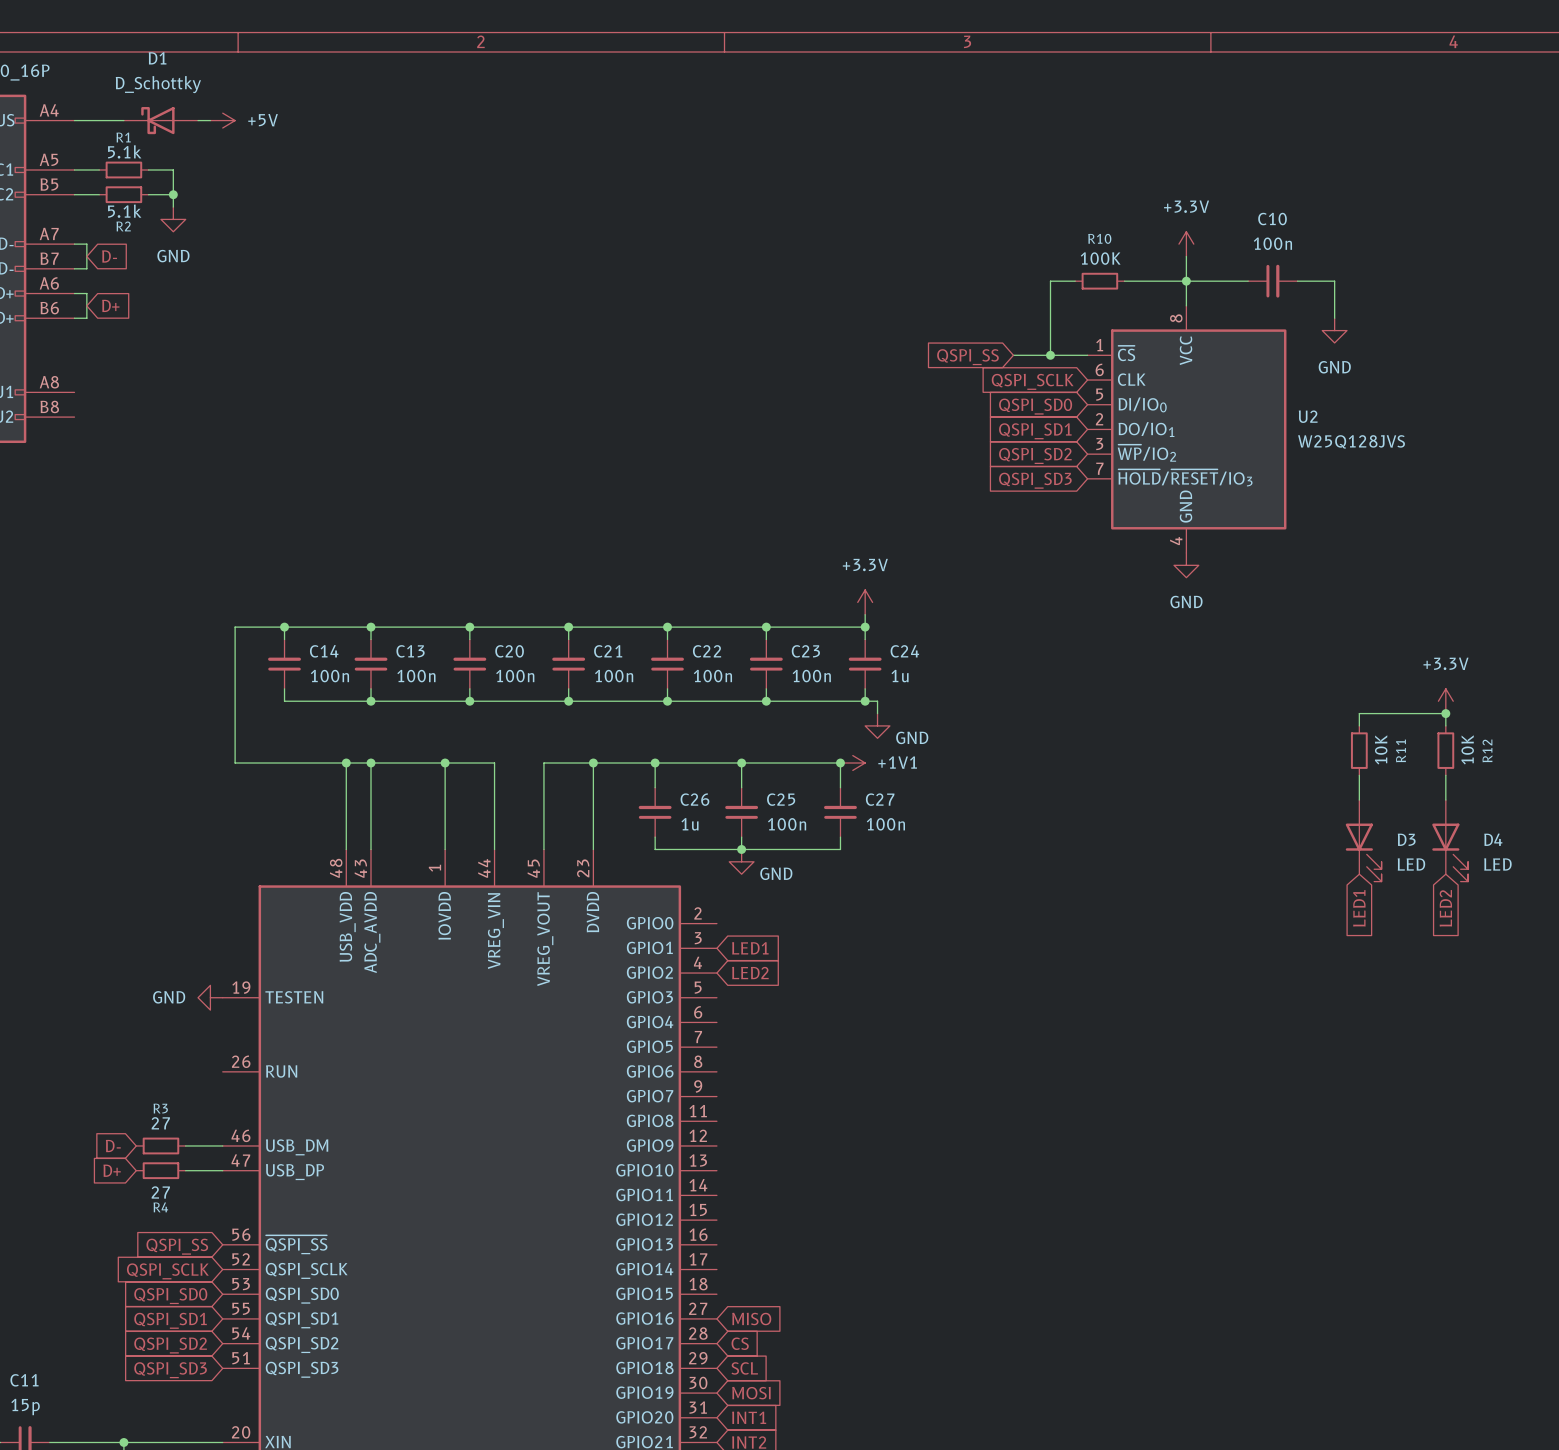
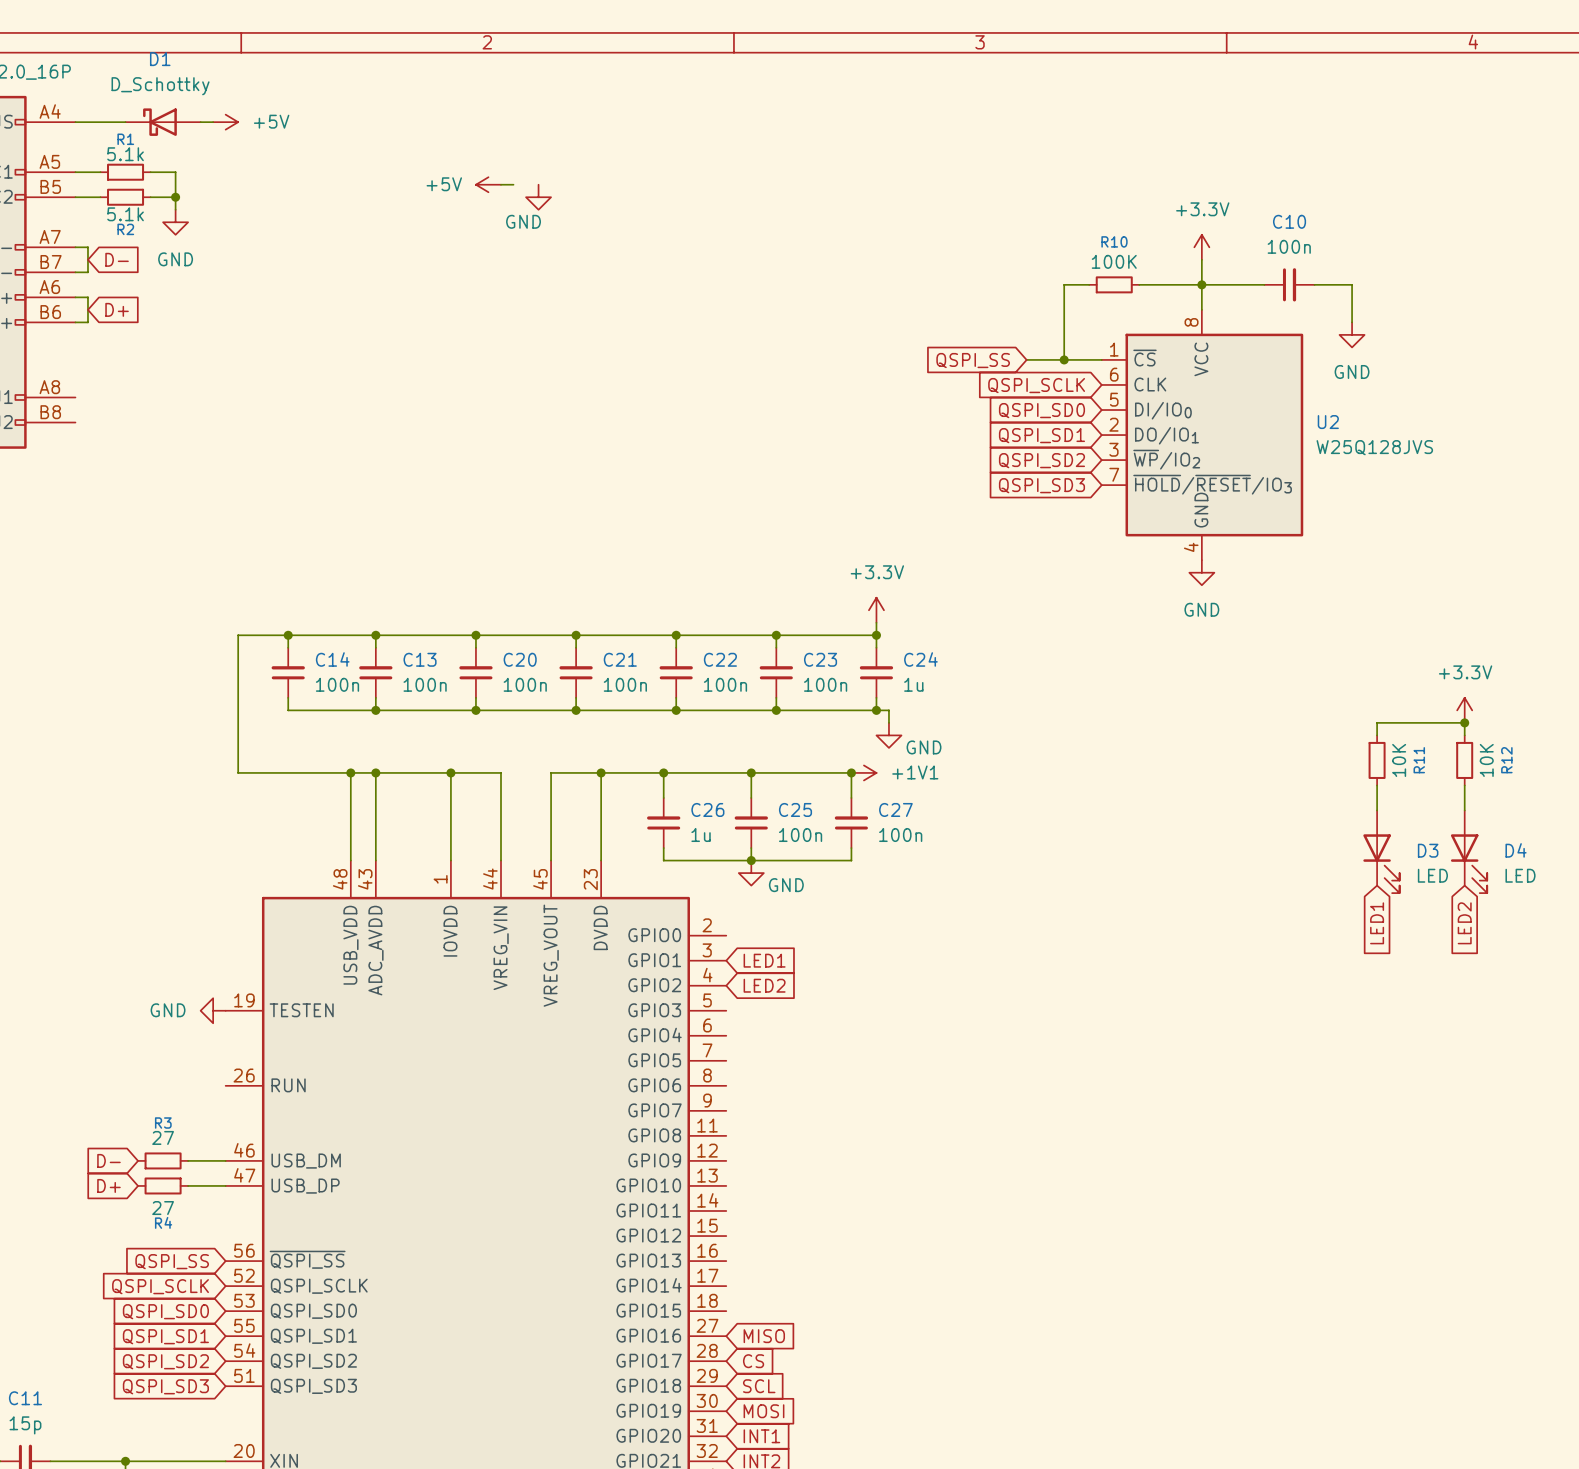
power symbol: none -> +5V (488, 184)
wire: none -> (501, 184) (513, 184)
power symbol: none -> GND (538, 197)

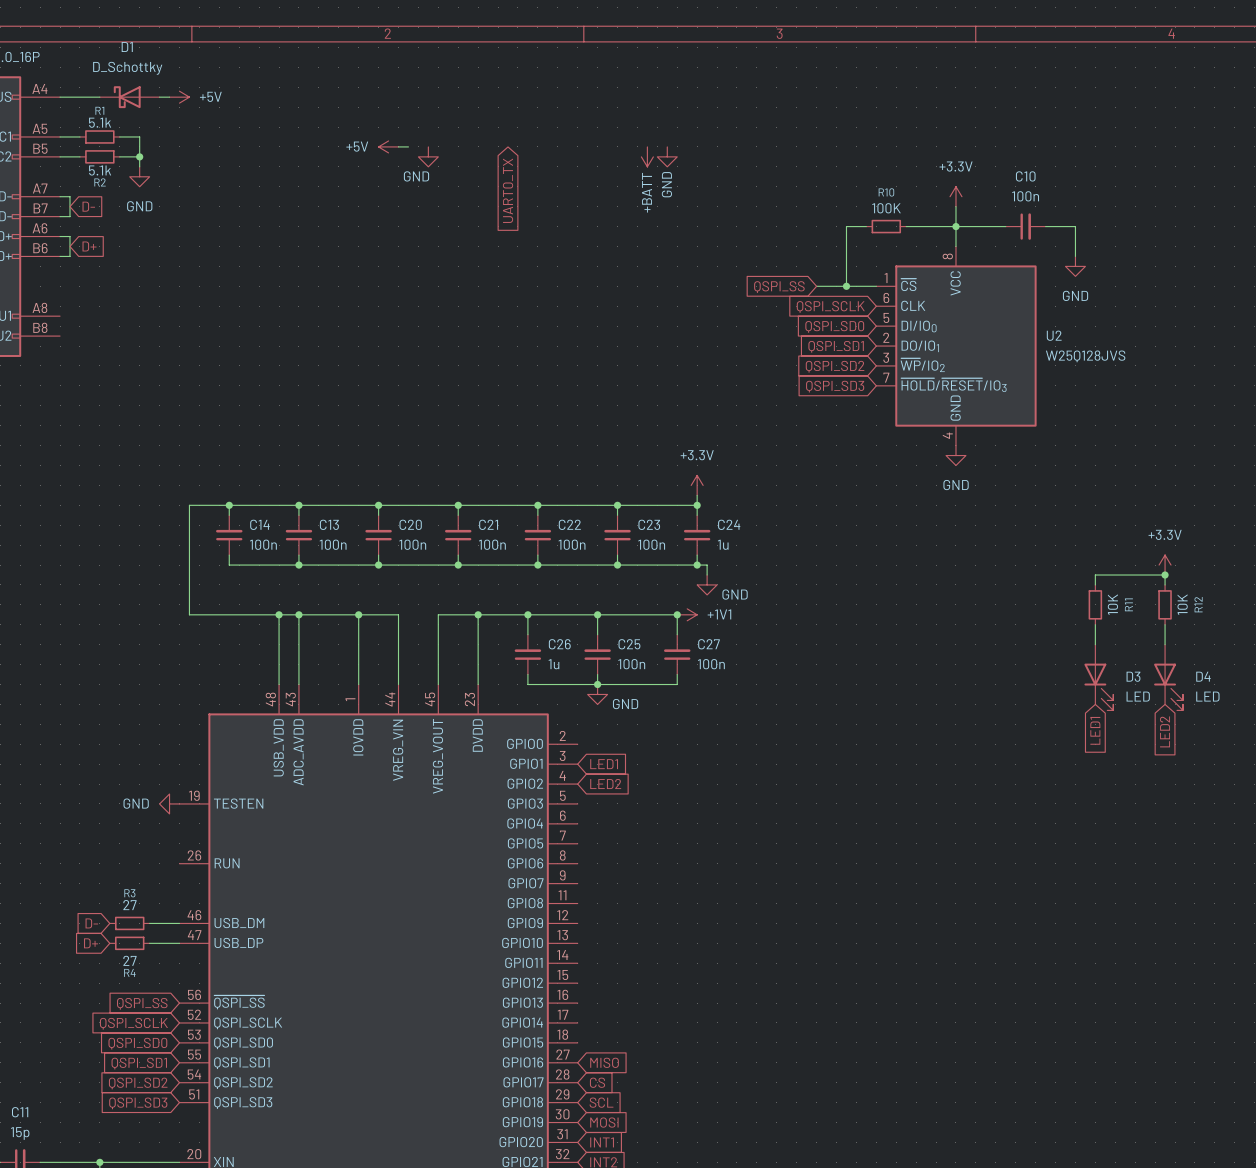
power symbol: none -> +BATT (647, 156)
power symbol: none -> GND (667, 156)
global label: none -> UART0_TX (508, 190)

